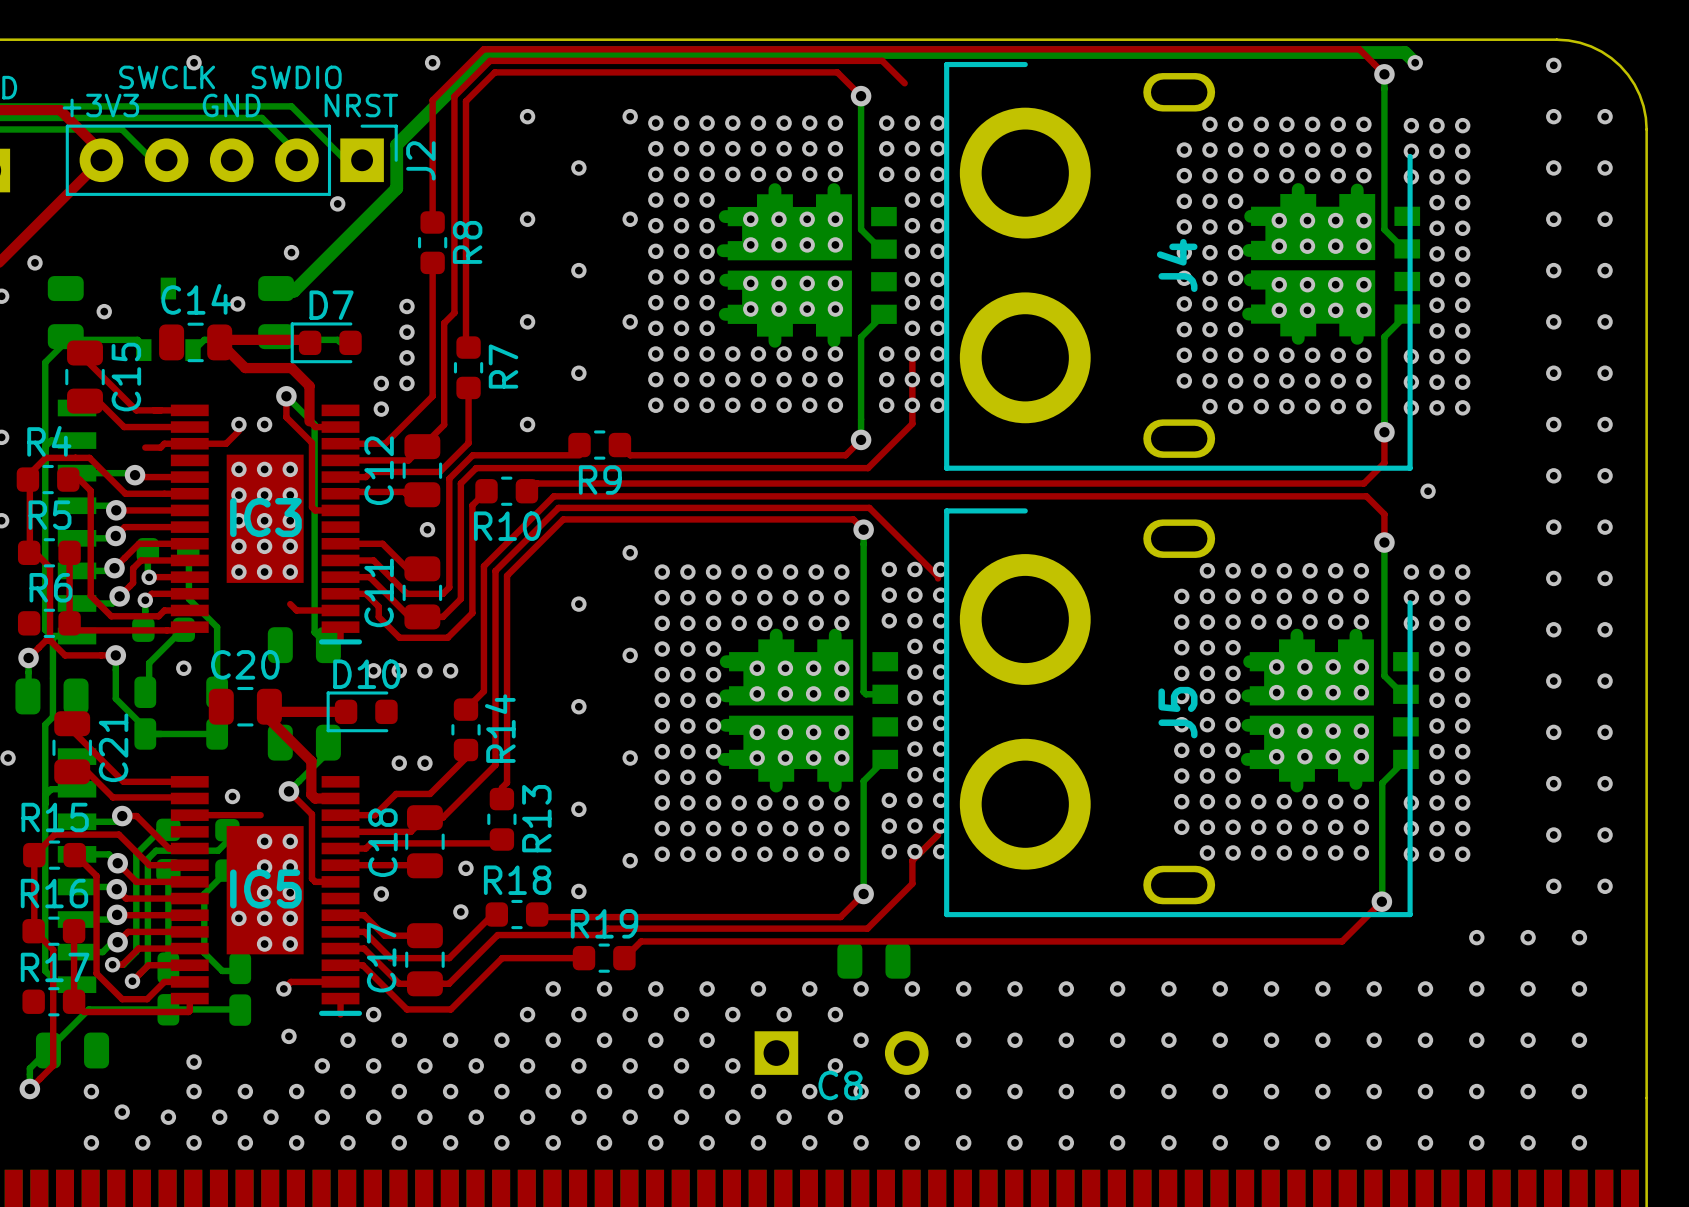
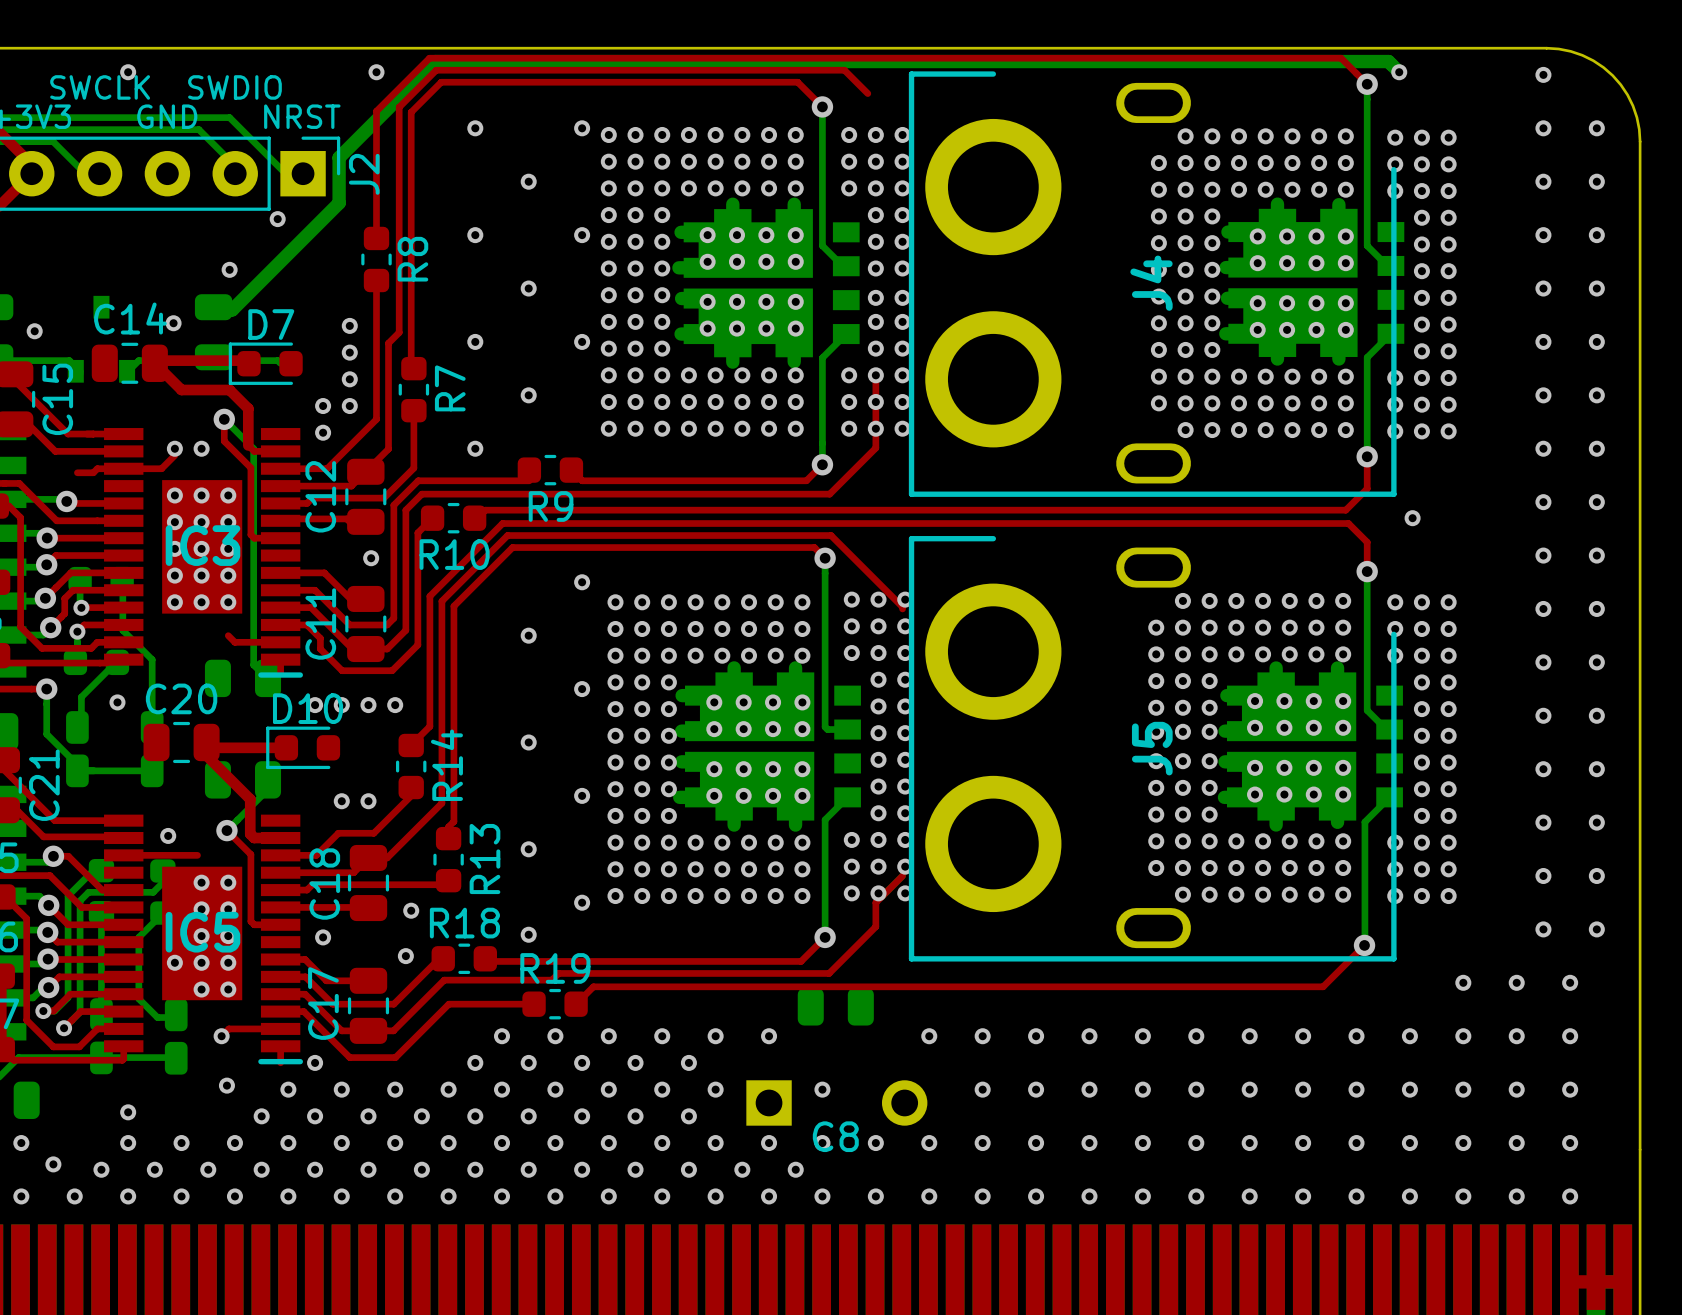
via: (861, 988) -> none
via: (912, 988) -> none
via position: (784, 1014) -> (715, 1089)
via: (835, 1014) -> none
via: (963, 1040) -> none
C8 position: (841, 1053) -> (836, 1102)
via: (835, 1065) -> none

